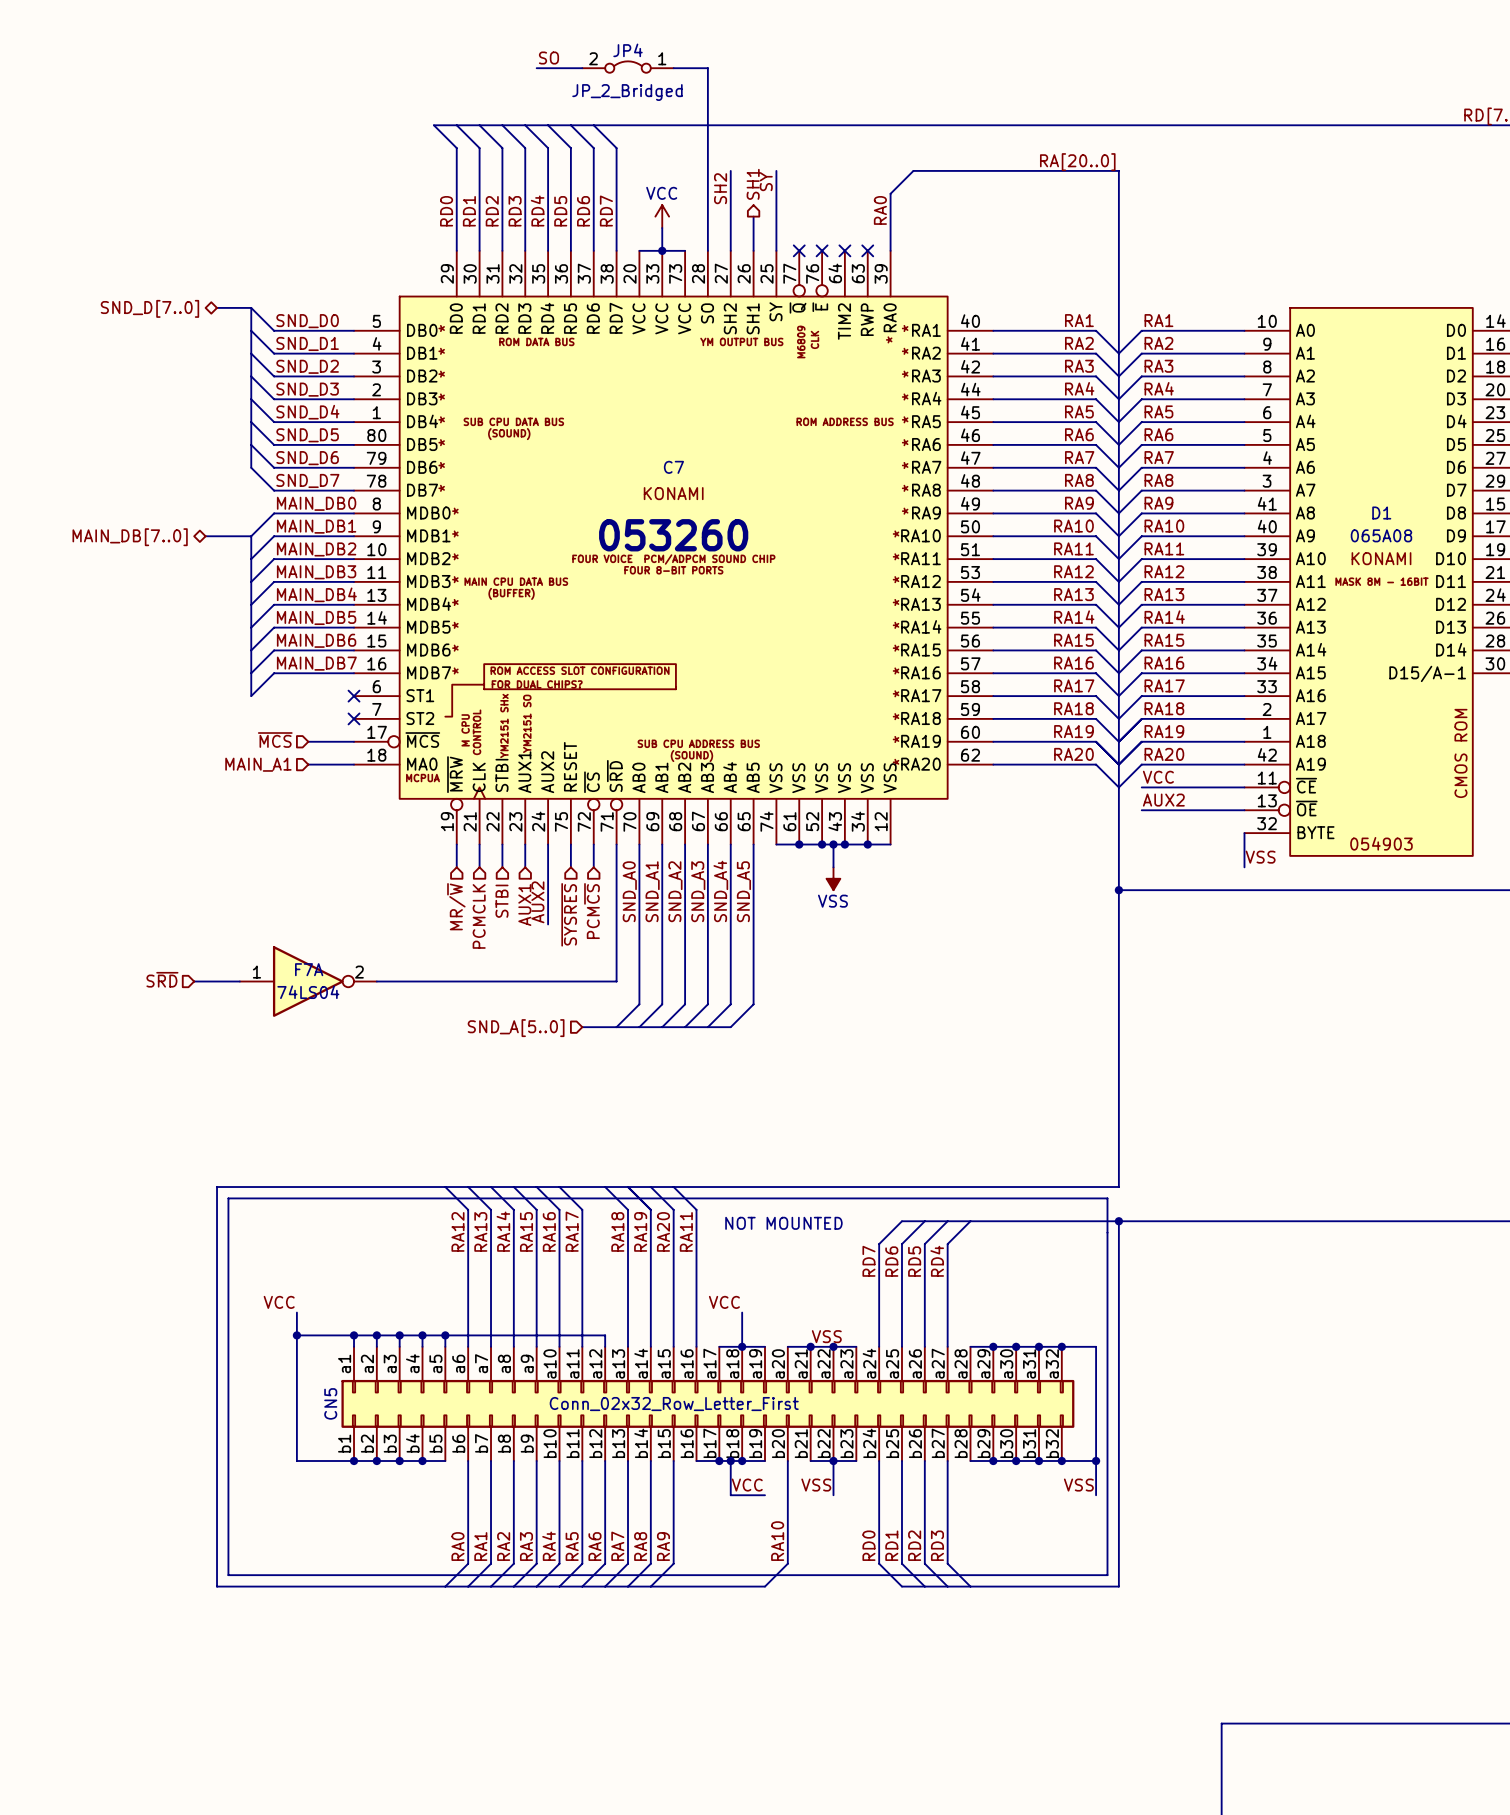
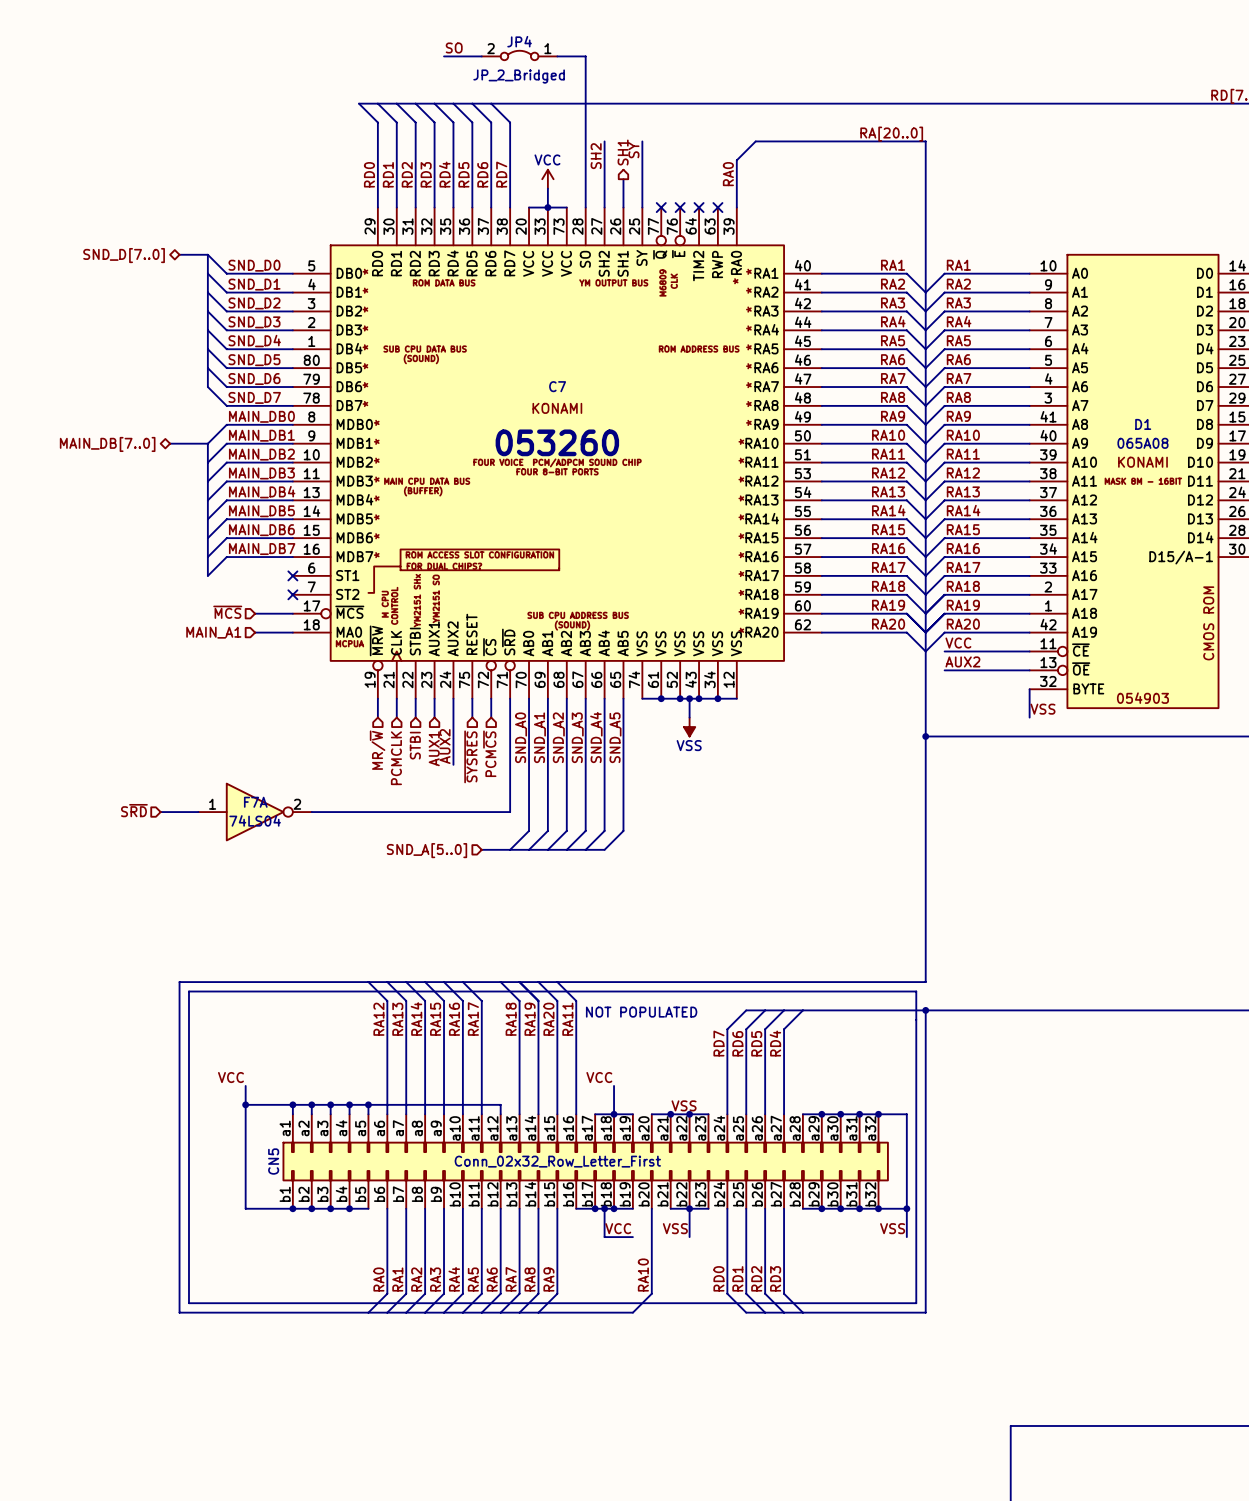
text: NOT MOUNTED (783, 1223) -> NOT POPULATED (641, 1012)

